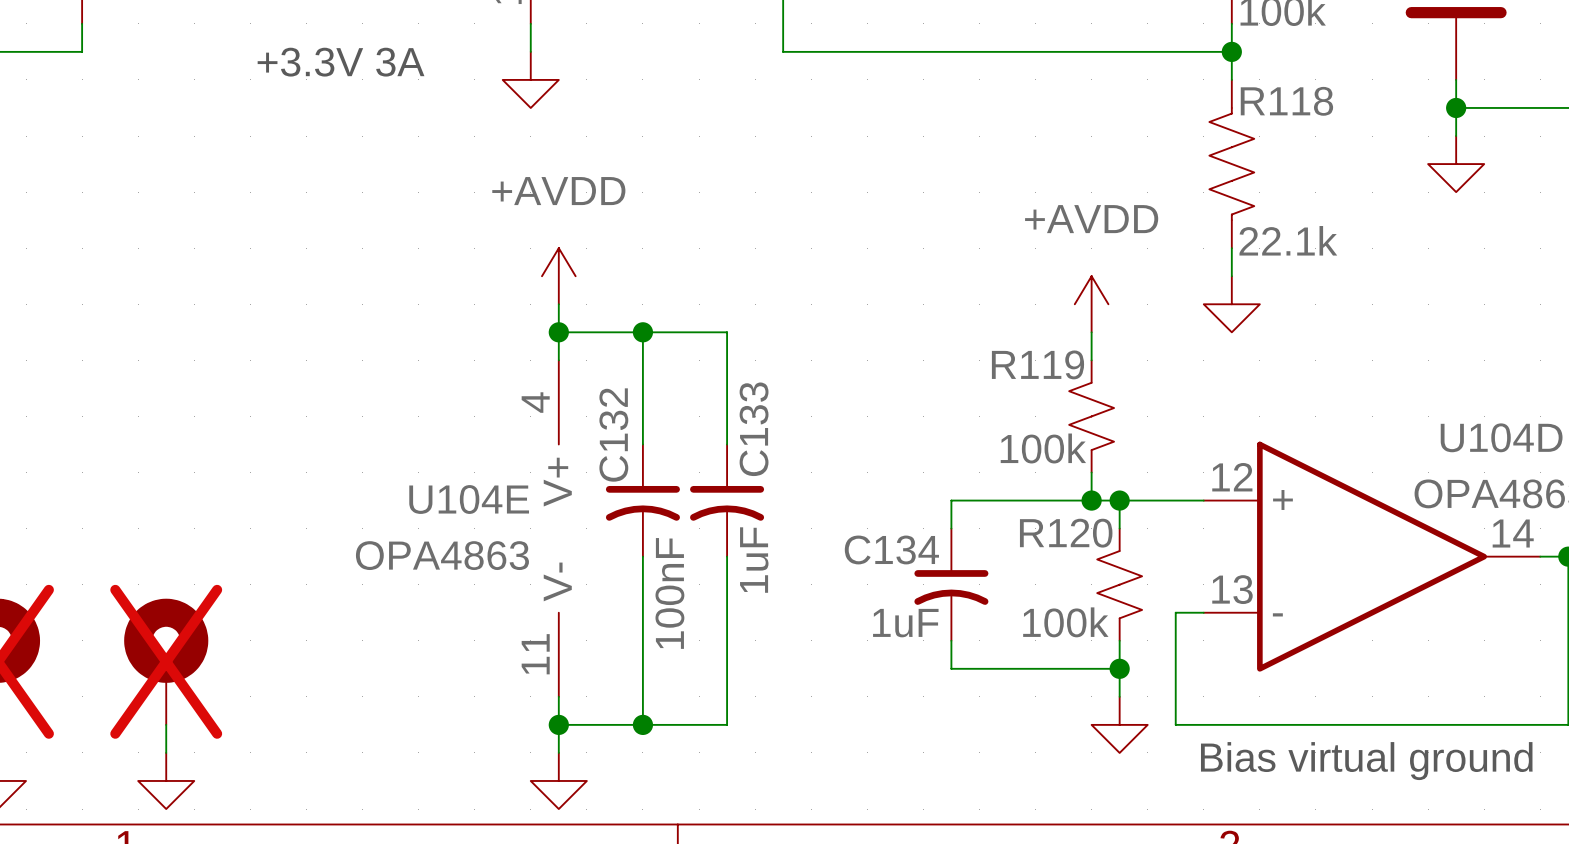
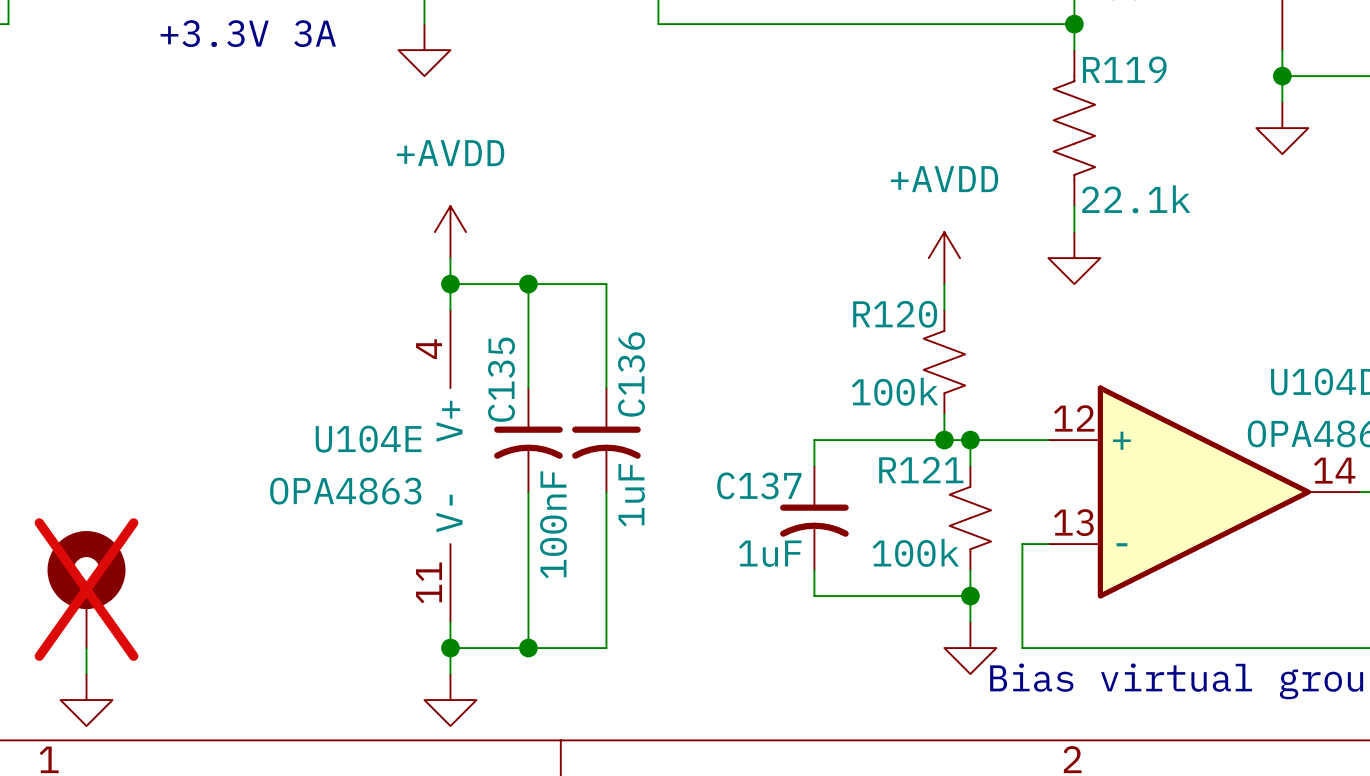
R118 name: R118 (1286, 101) -> R119 (1124, 69)
R119 name: R119 (1037, 364) -> R120 (895, 314)
C133 name: C133 (754, 429) -> C136 (631, 374)
C132 name: C132 (613, 435) -> C135 (501, 379)
R120 name: R120 (1066, 533) -> R121 (921, 470)
C134 name: C134 (891, 549) -> C137 (759, 485)

